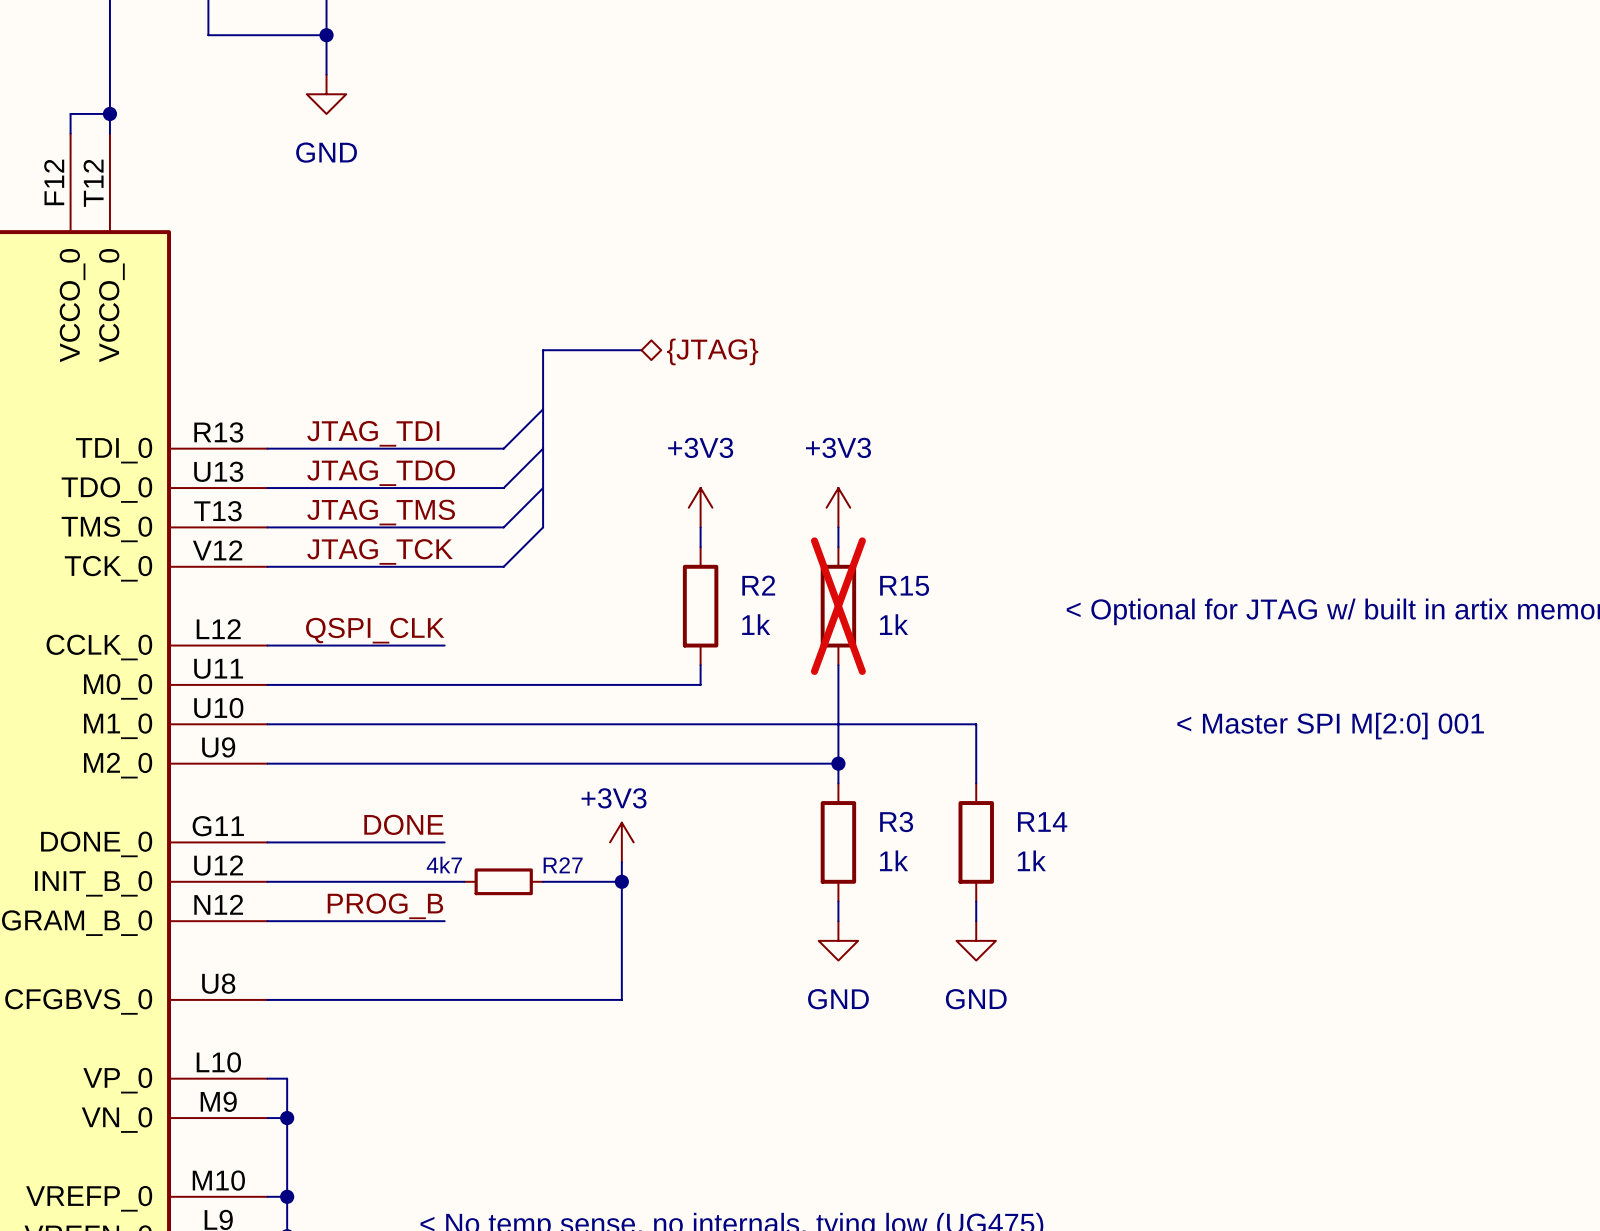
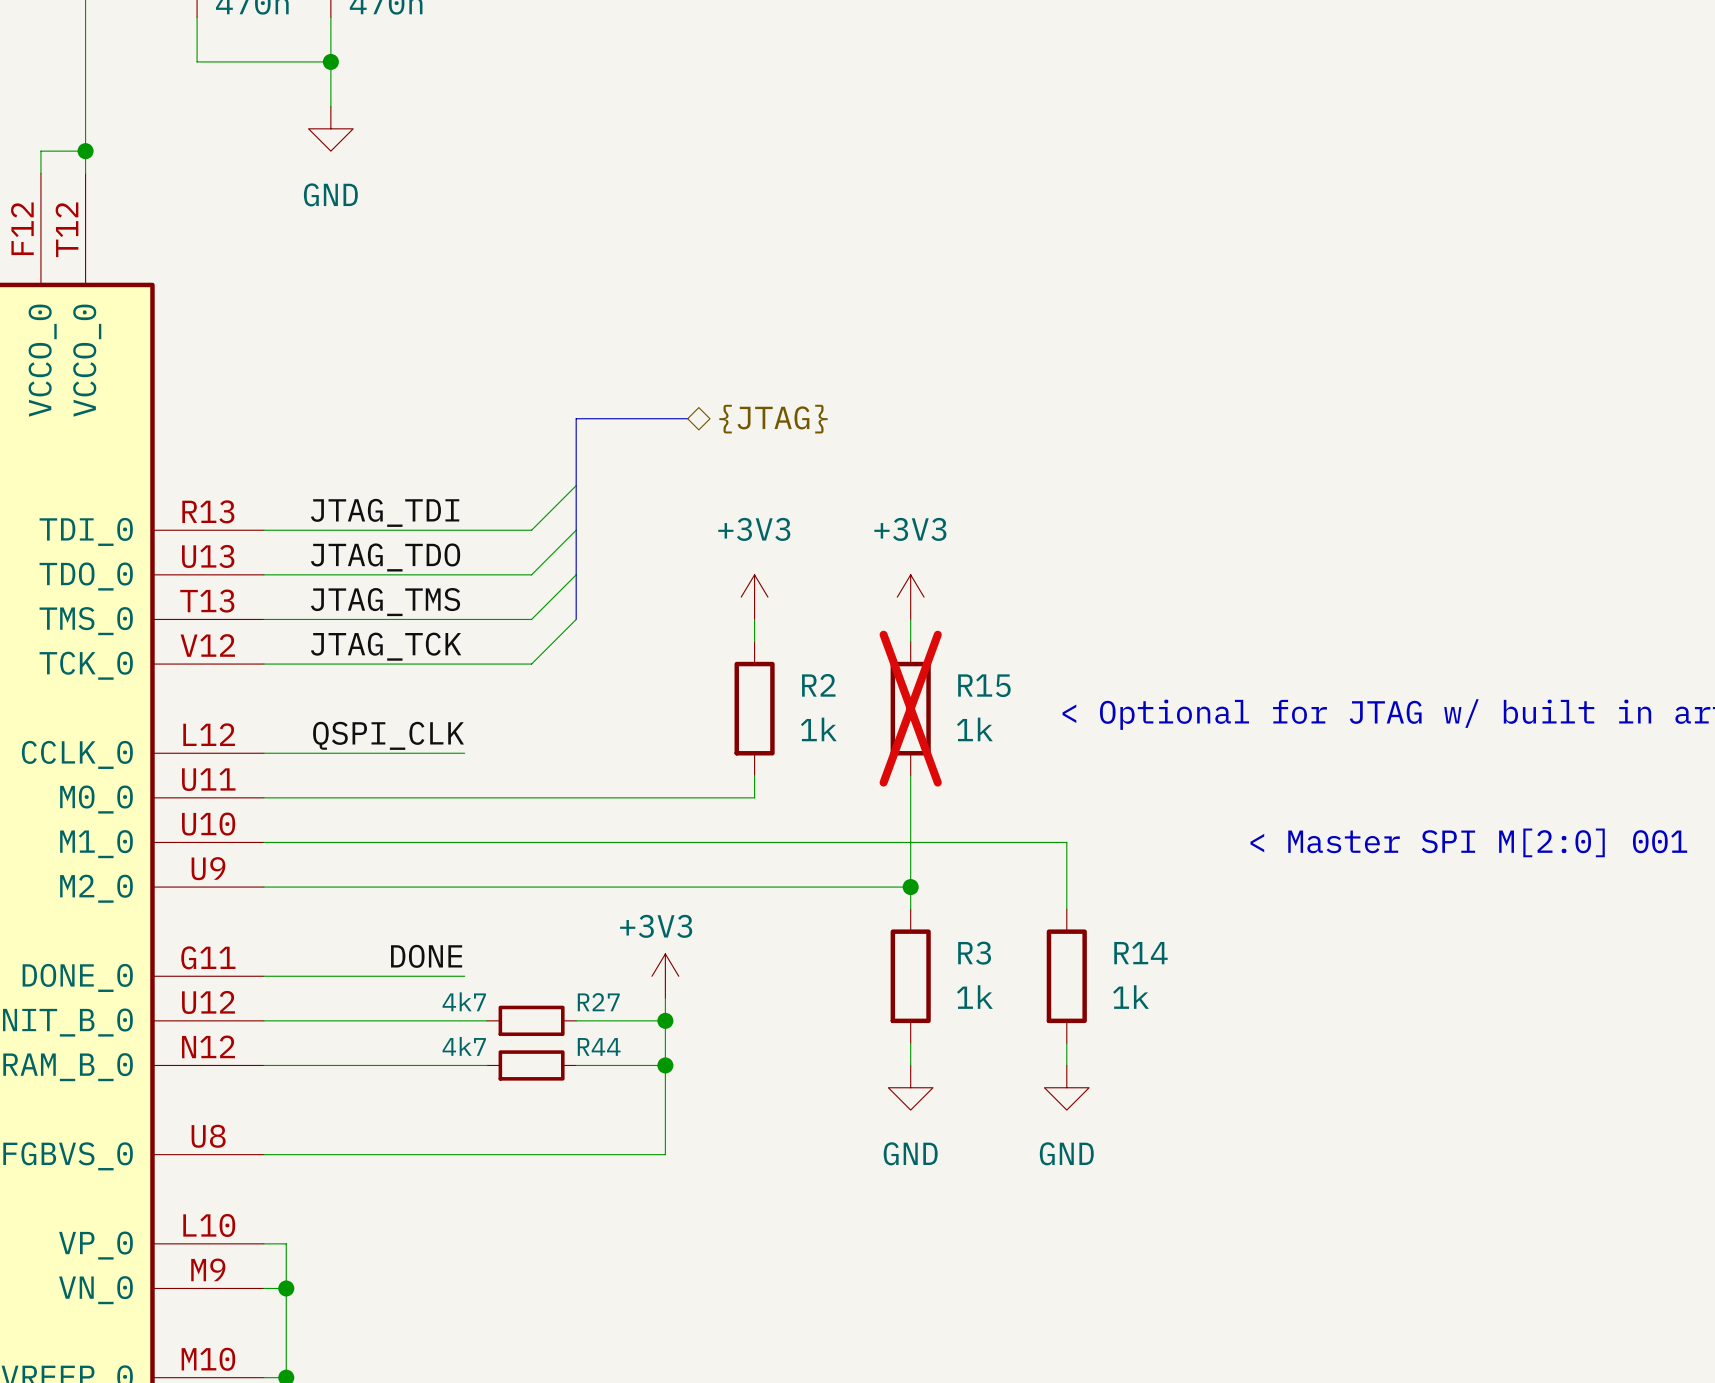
label: PROG_B (385, 906) -> none
wire: none -> (464, 1065) (486, 1065)
R44: none -> 4k7 (531, 1065)
wire: none -> (576, 1065) (665, 1065)
junction: none -> (665, 1065)

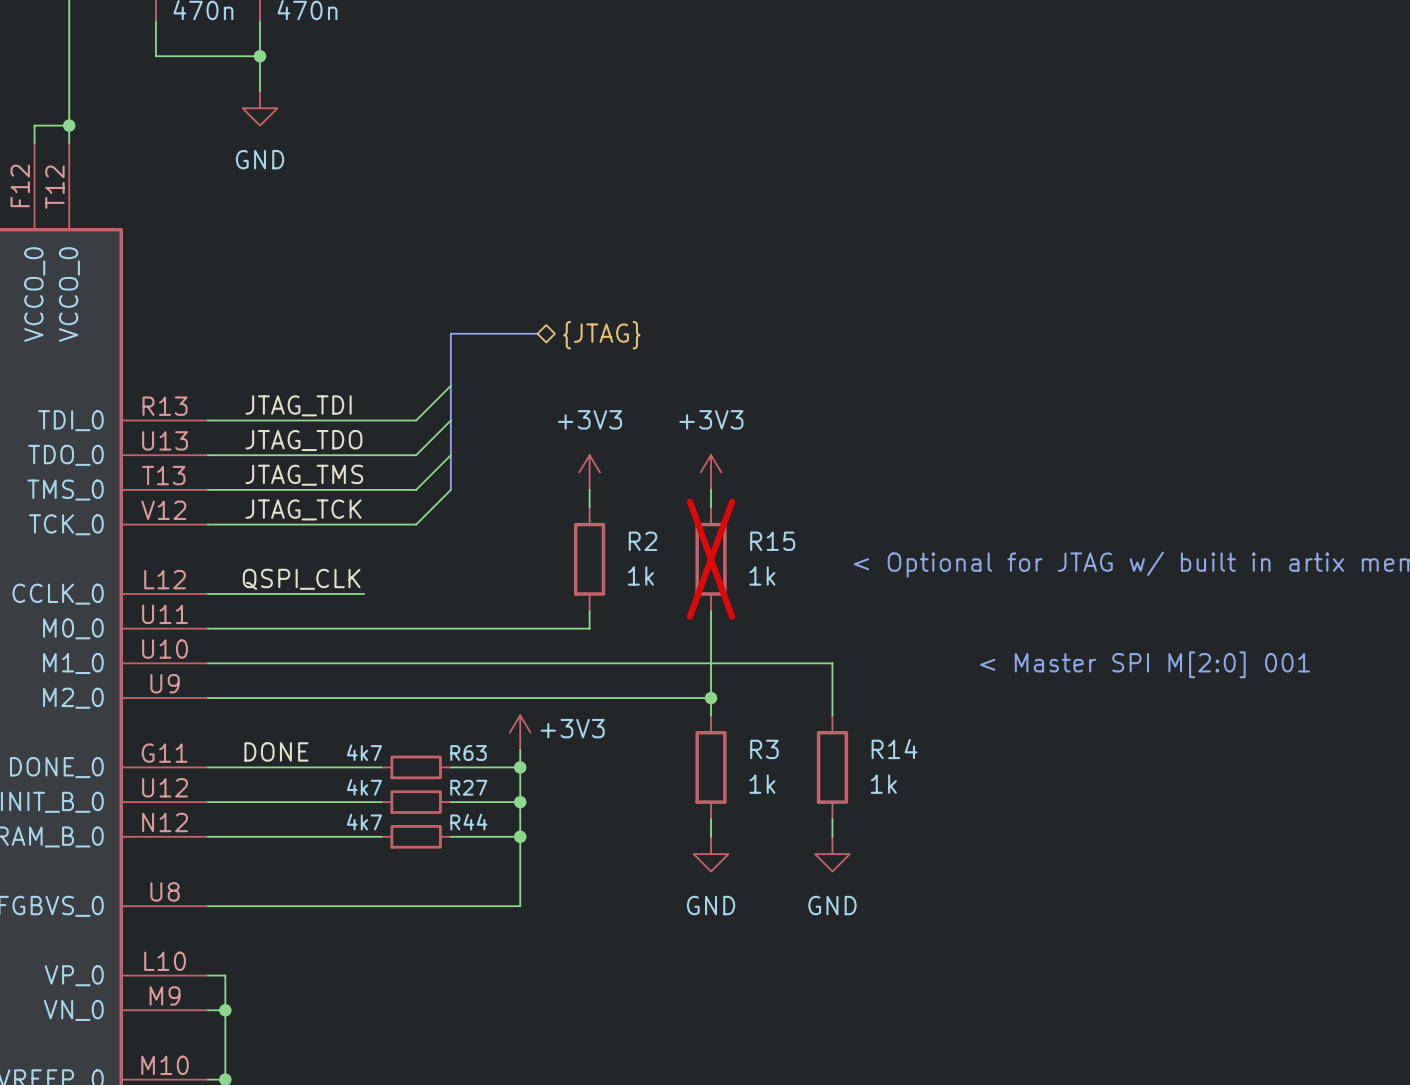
power symbol text position: +3V3 (656, 926) -> +3V3 (572, 728)
label position: DONE (426, 956) -> DONE (276, 751)
wire: none -> (364, 767) (381, 767)
R63: none -> 4k7 (416, 767)
wire: none -> (450, 767) (520, 767)
power symbol position: +3V3 (665, 976) -> +3V3 (520, 732)
junction: none -> (520, 767)

